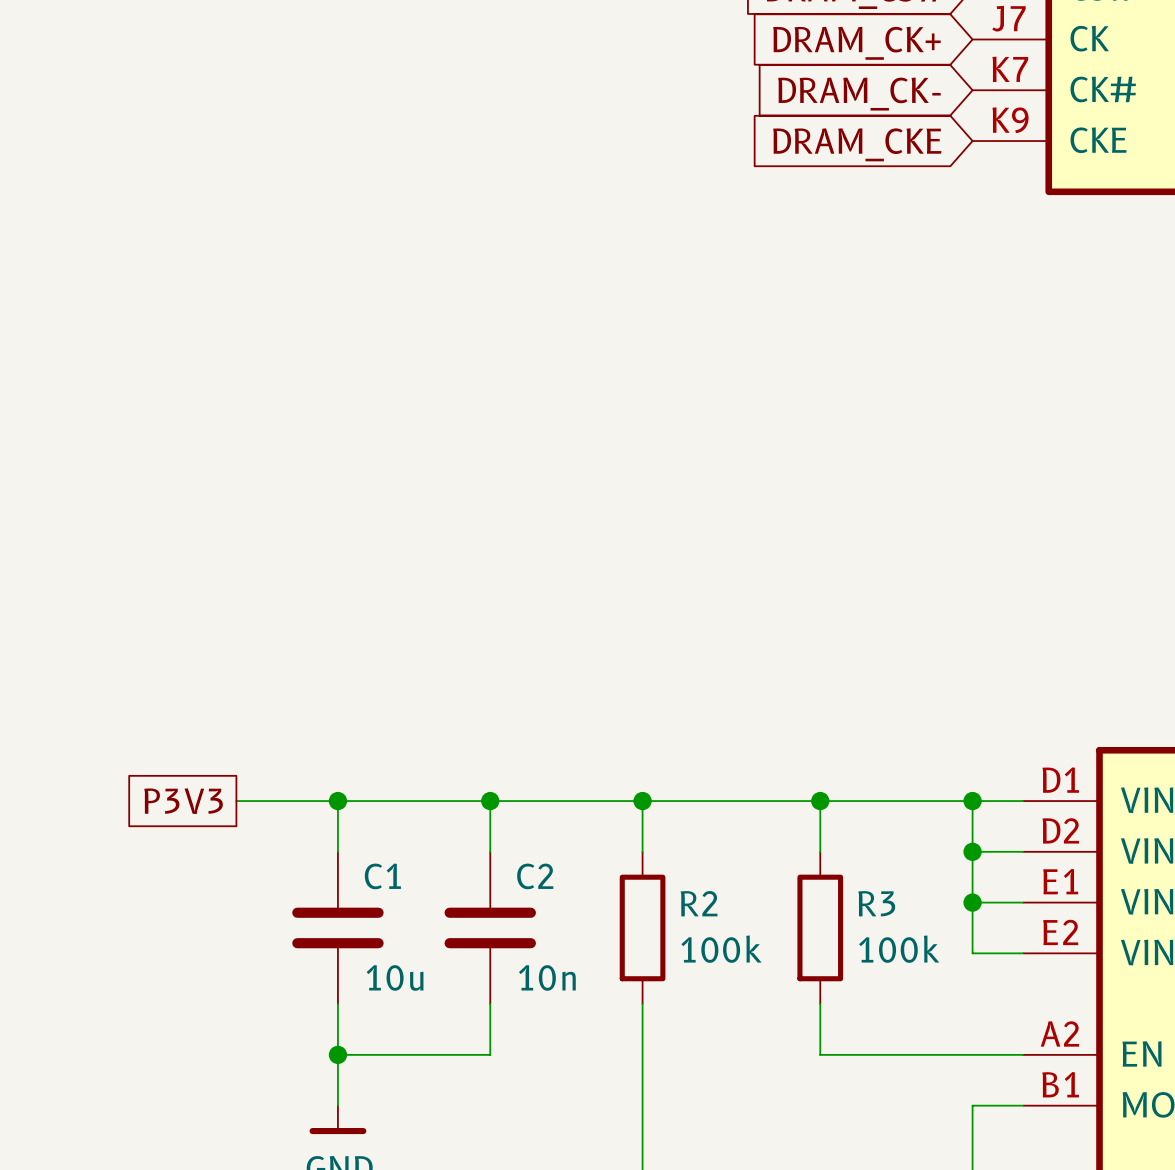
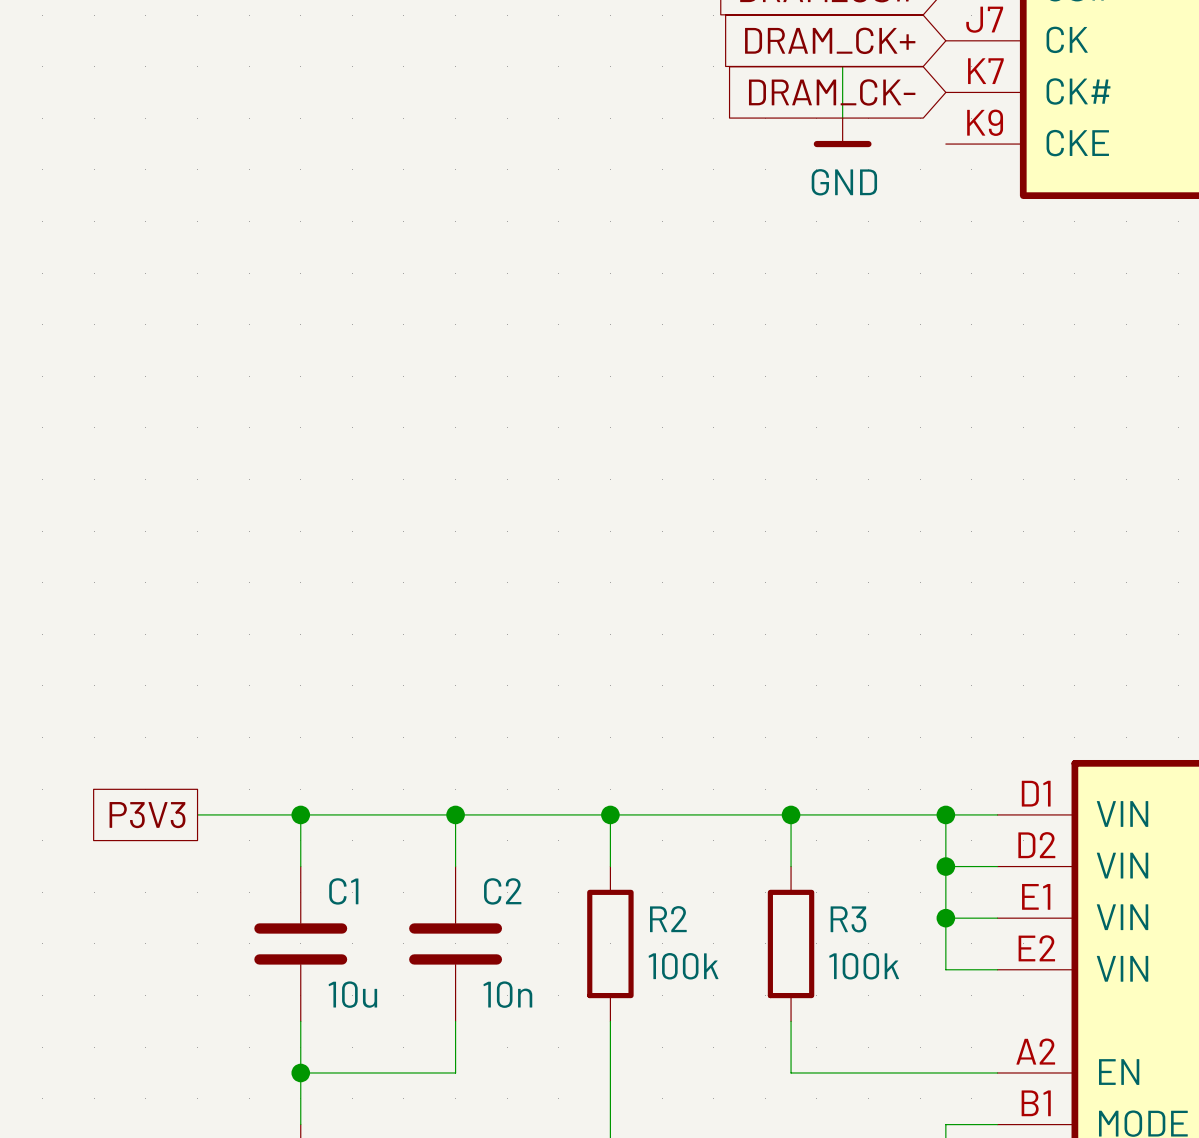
wire: none -> (842, 66) (842, 118)
power symbol: none -> GND (842, 132)
global label: DRAM_CKE (857, 144) -> none

